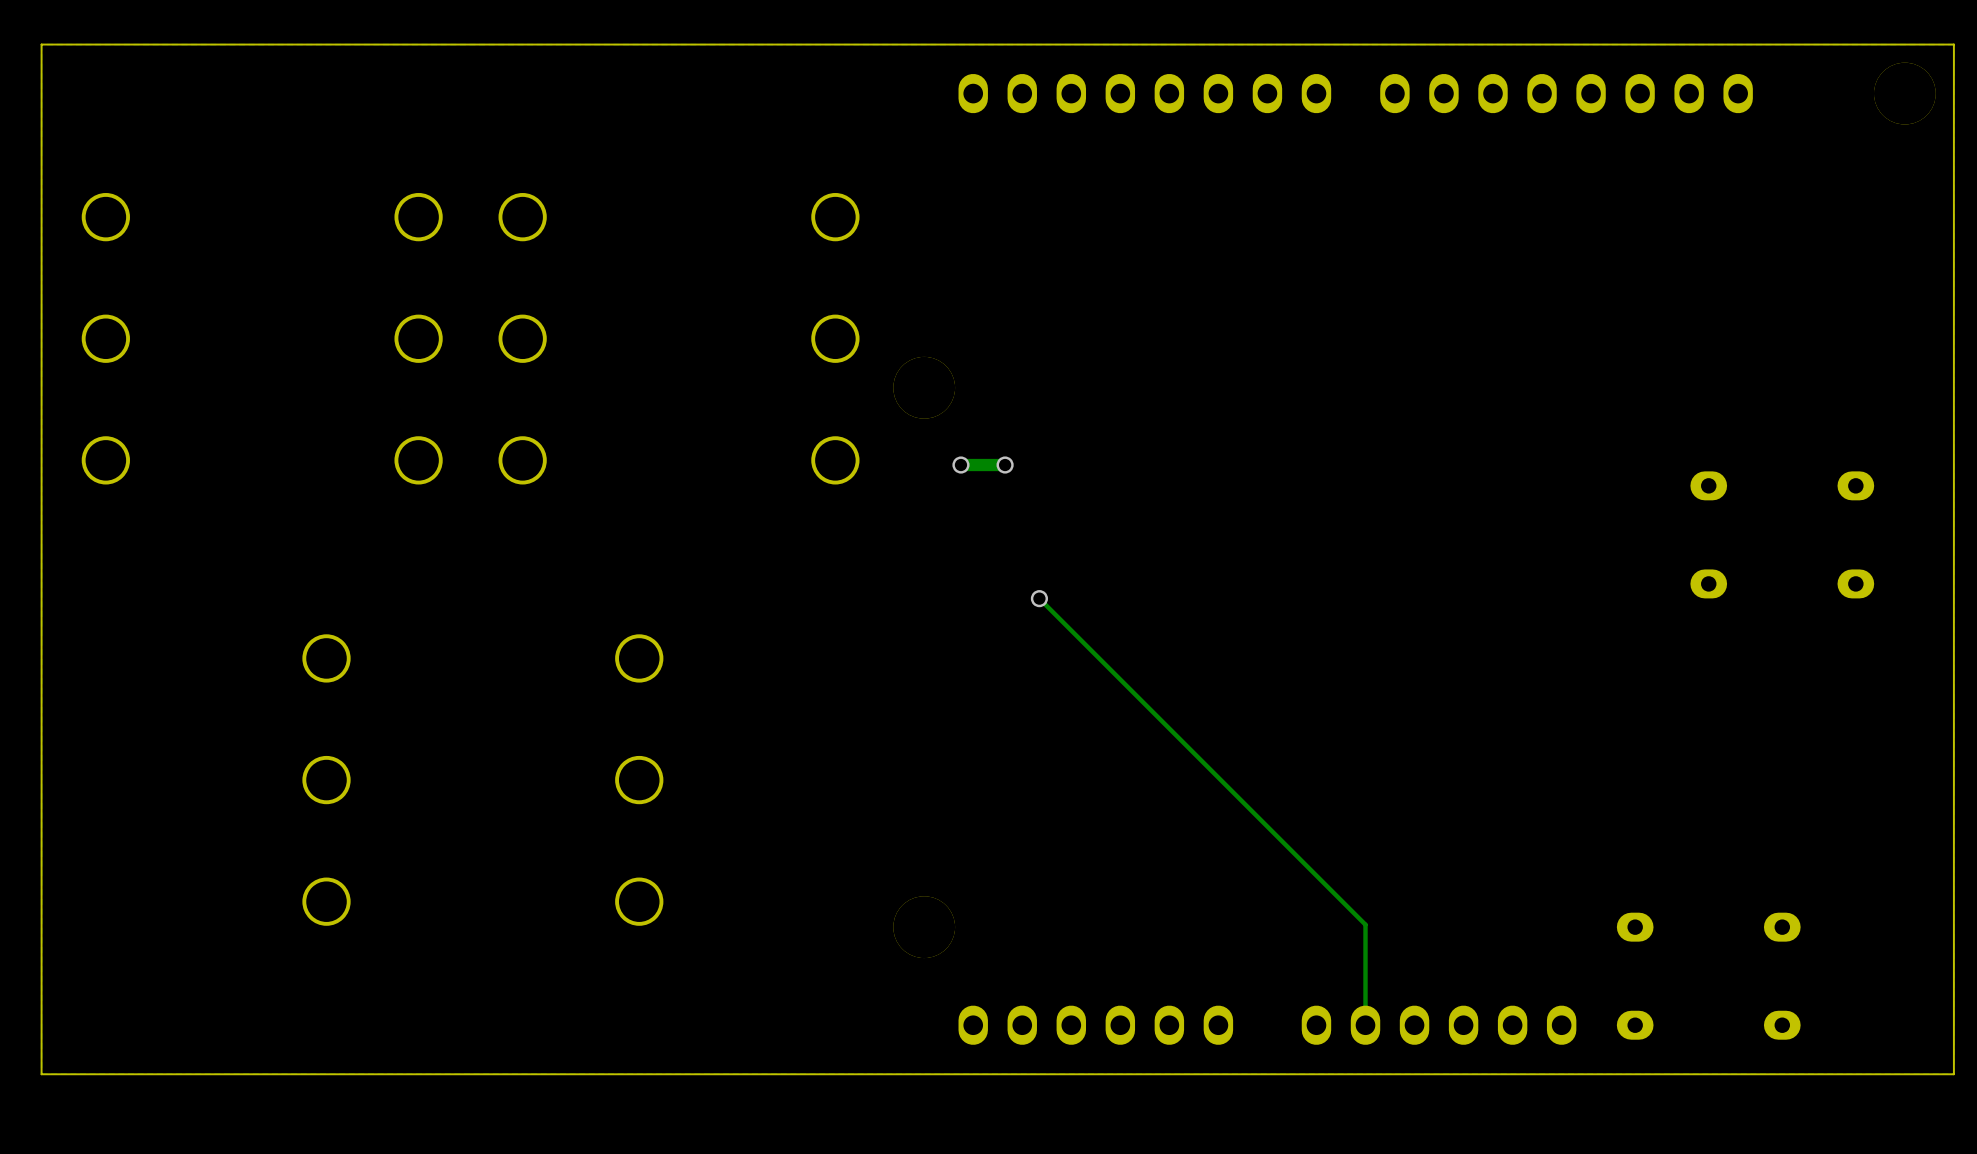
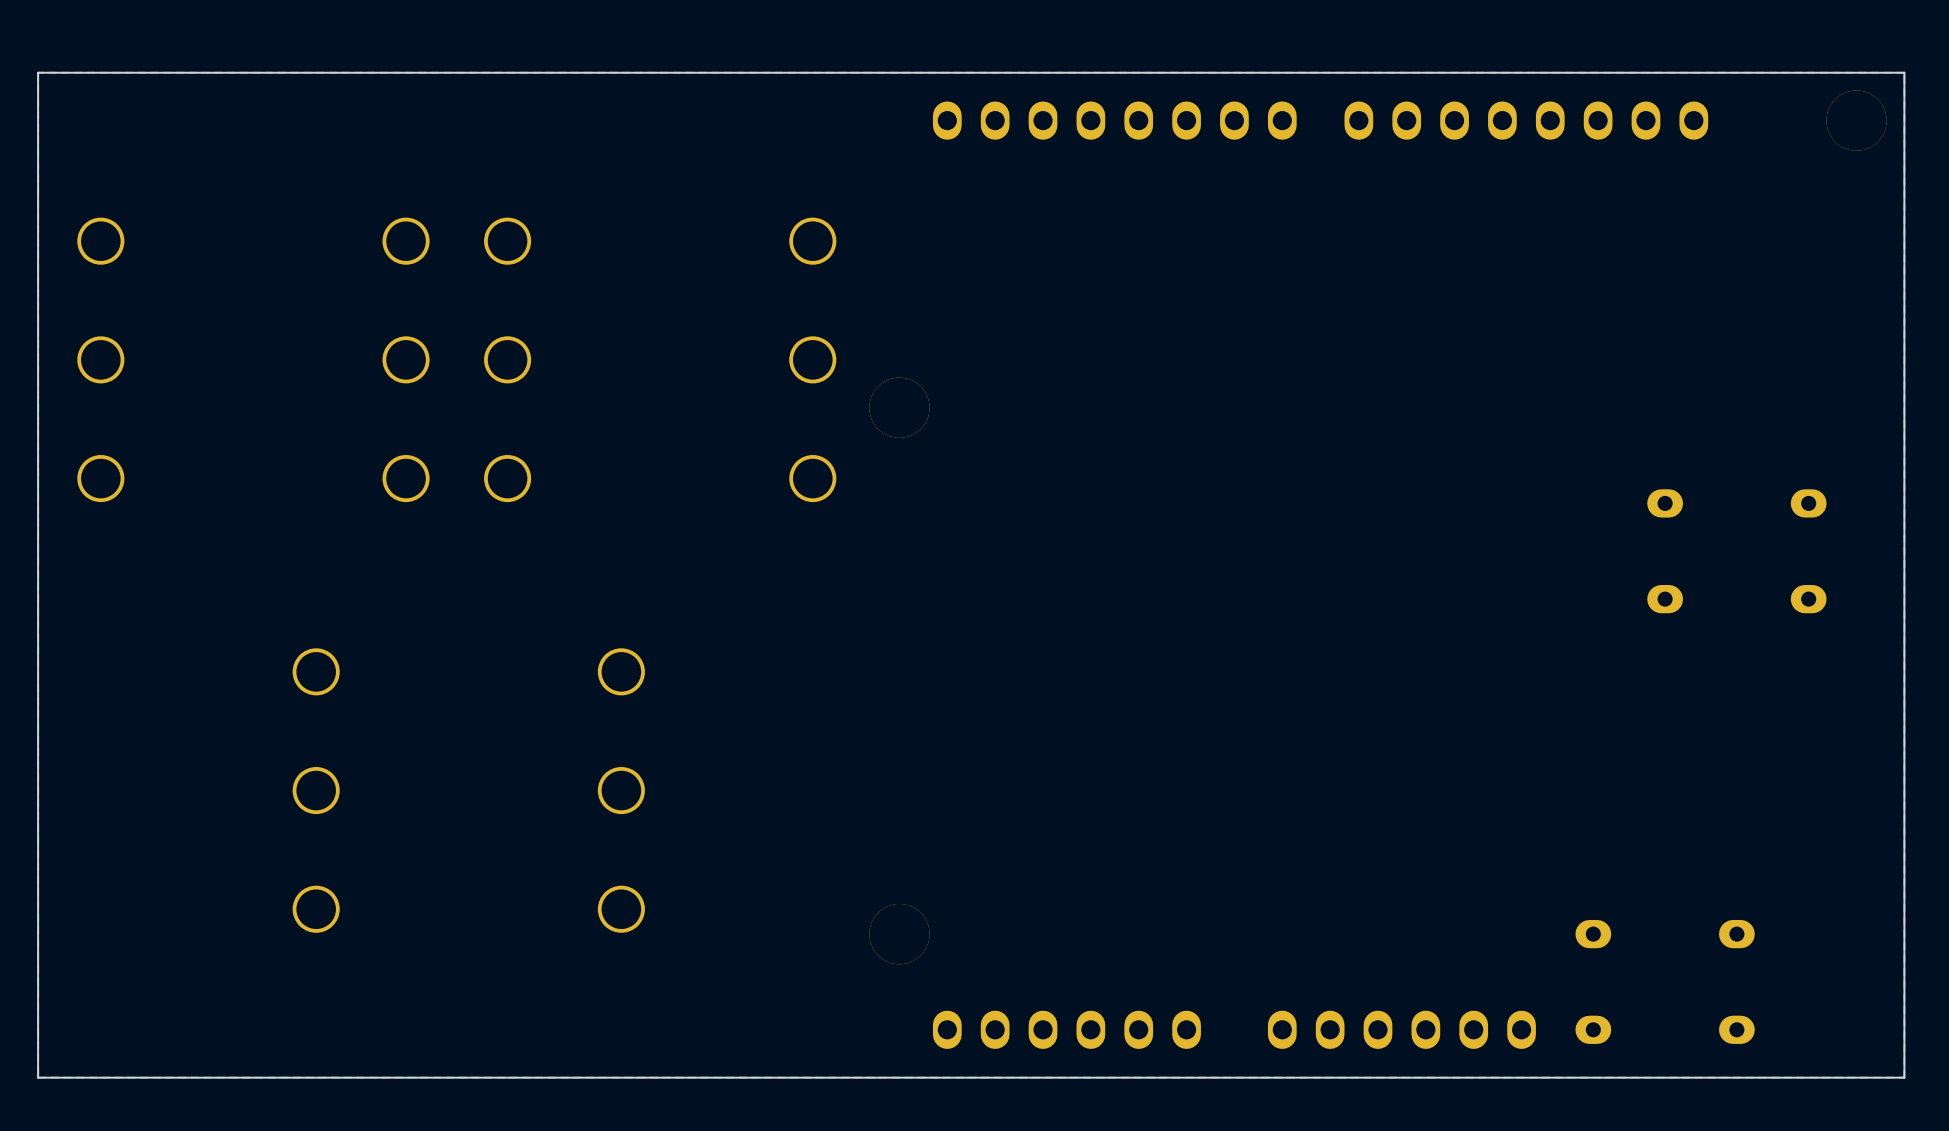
via: (960, 465) -> none
track: (1005, 465) (960, 465) -> none
via: (1005, 465) -> none
track: (1039, 598) (1365, 924) (1365, 1025) -> none
via: (1039, 598) -> none

